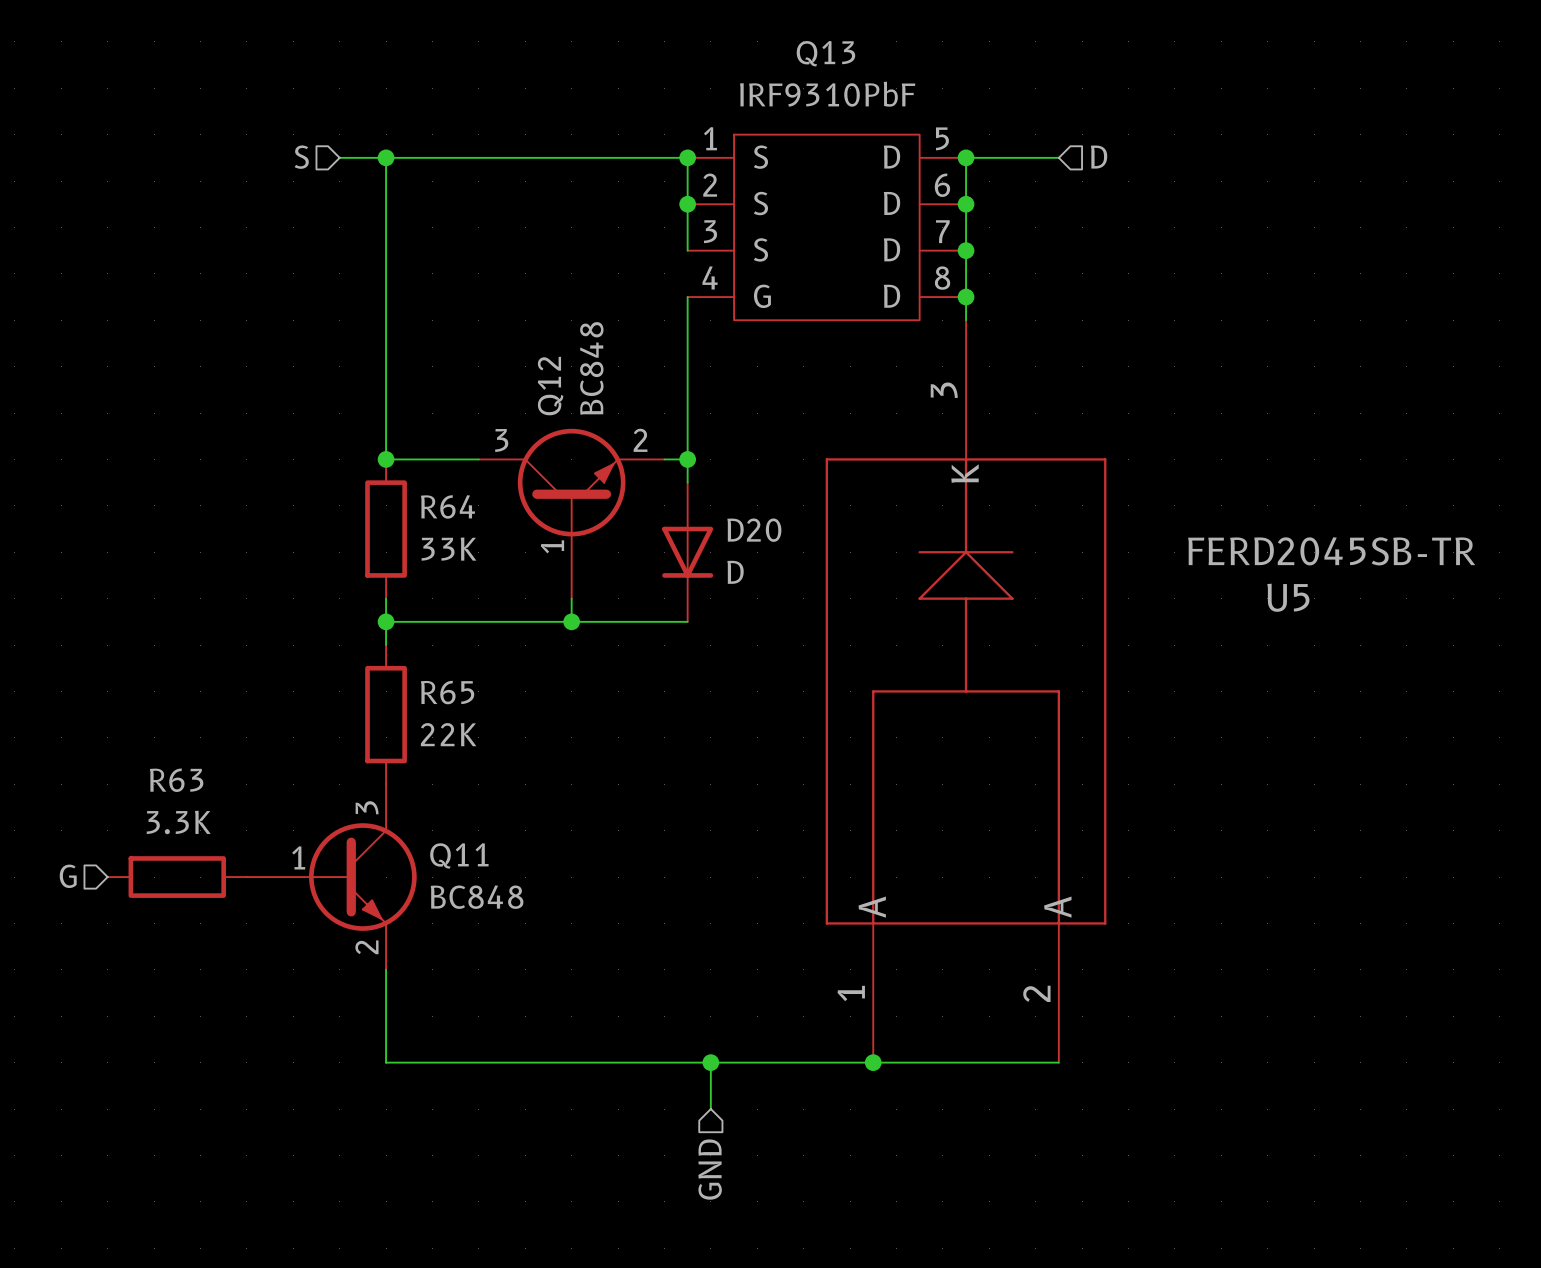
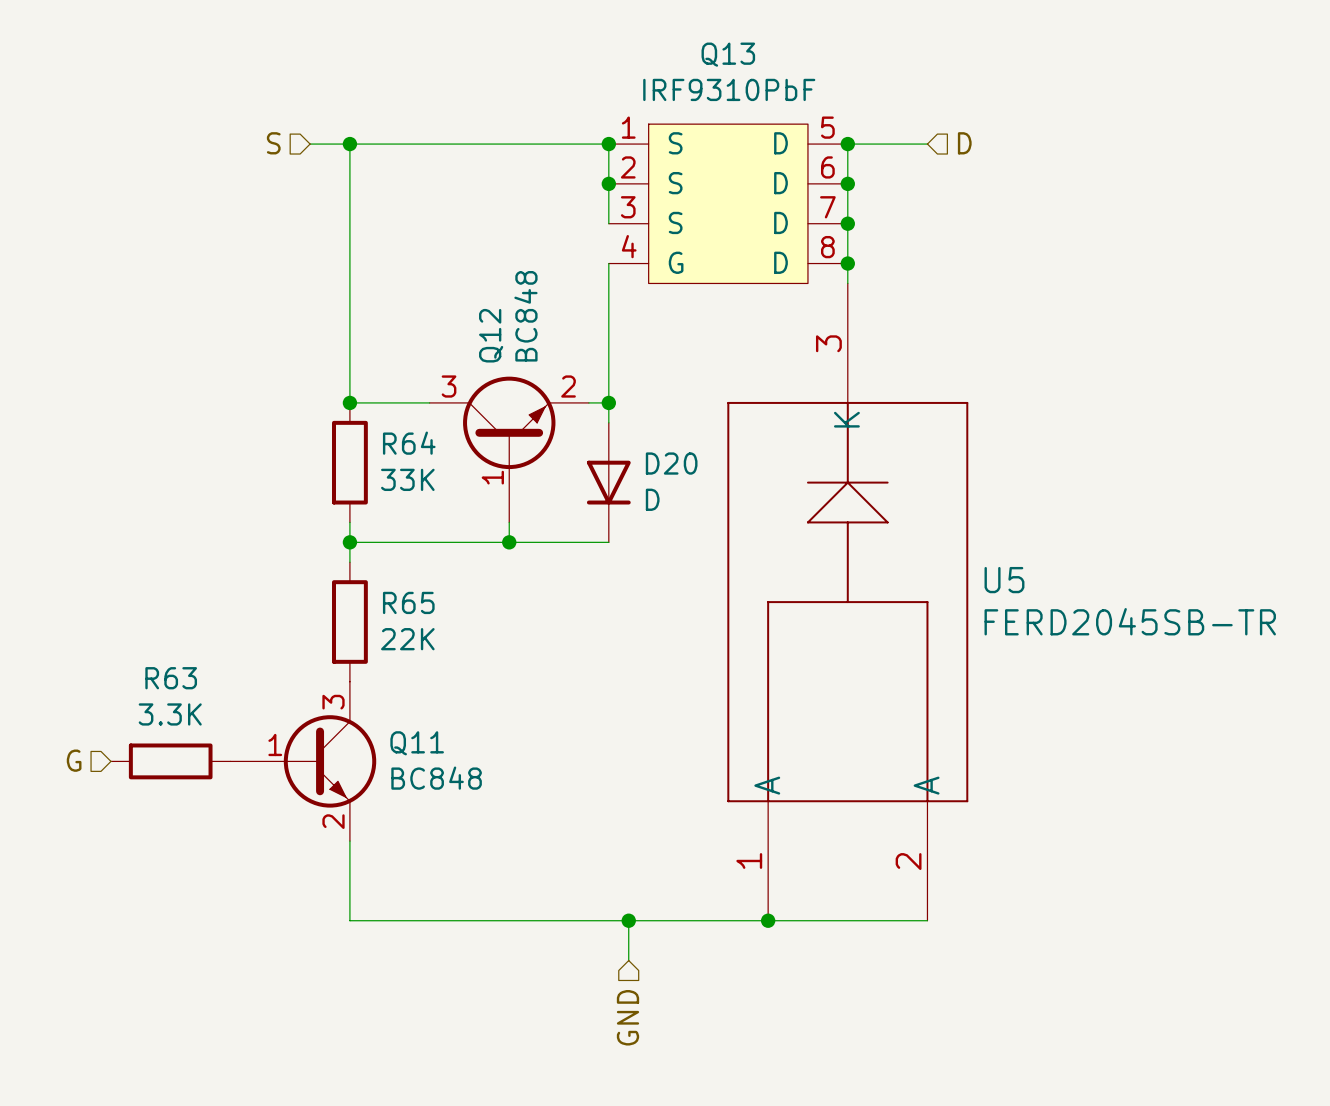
U5 value position: FERD2045SB-TR (1331, 551) -> FERD2045SB-TR (1130, 621)
U5 name position: U5 (1288, 597) -> U5 (1004, 580)

